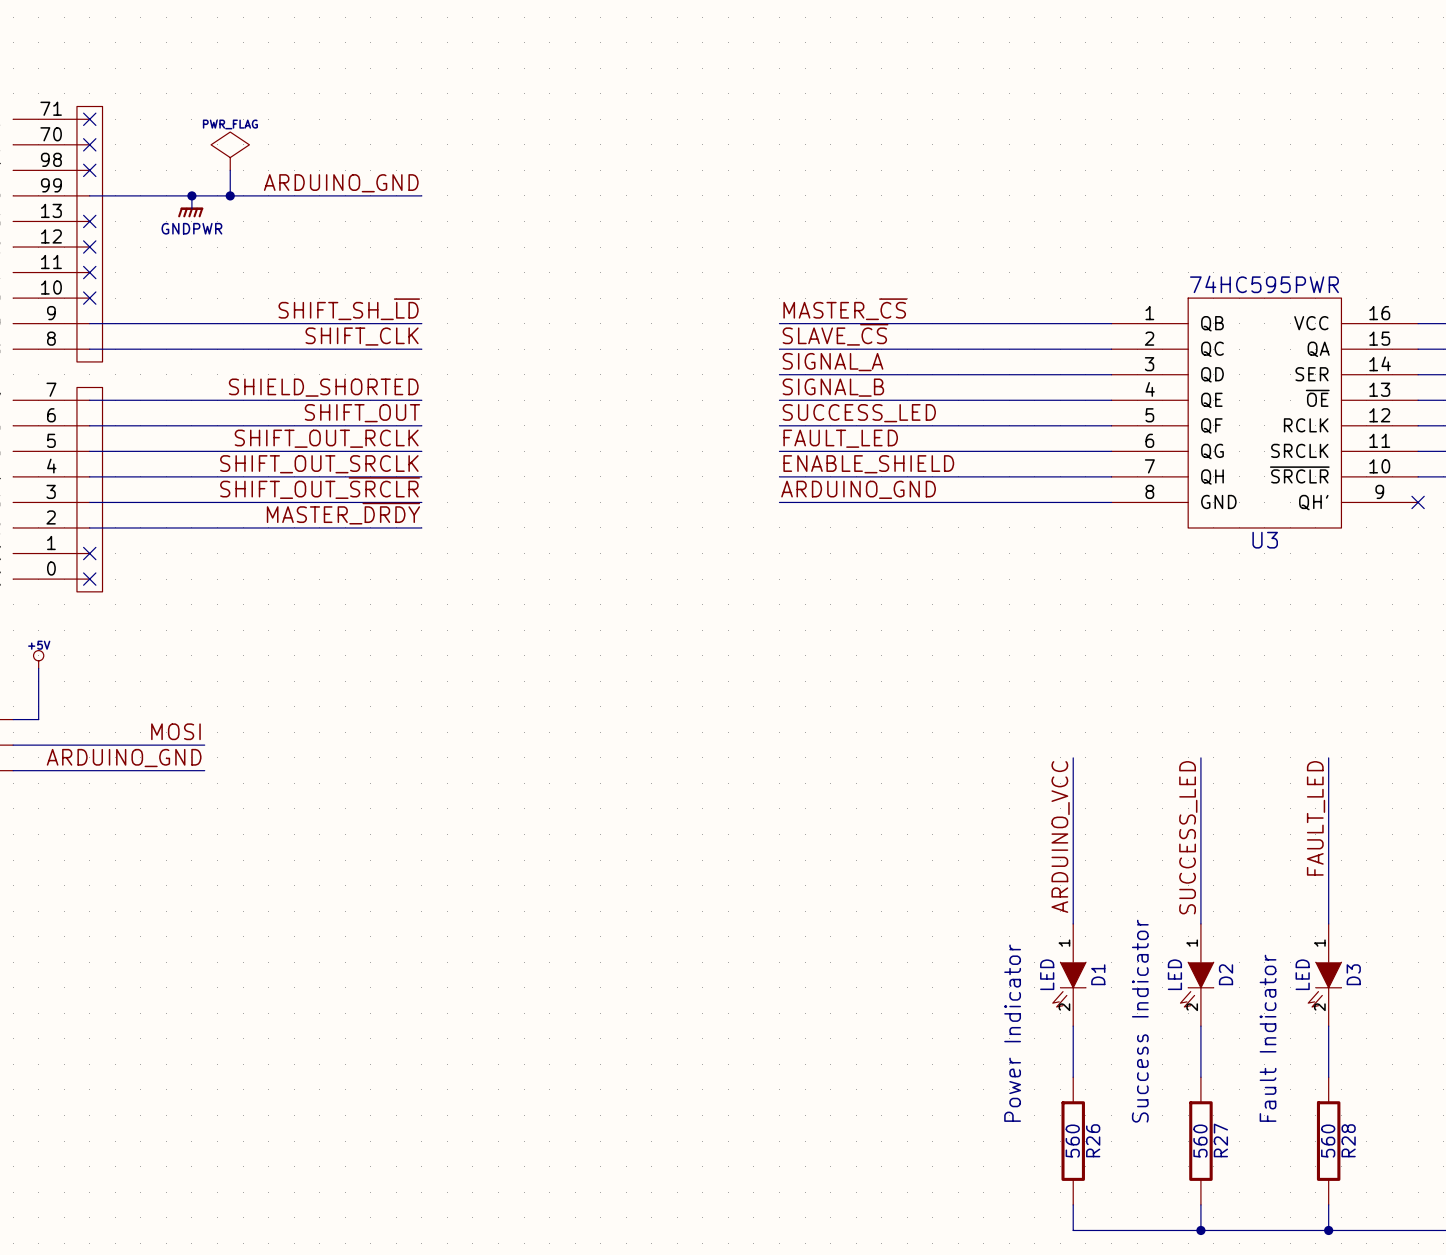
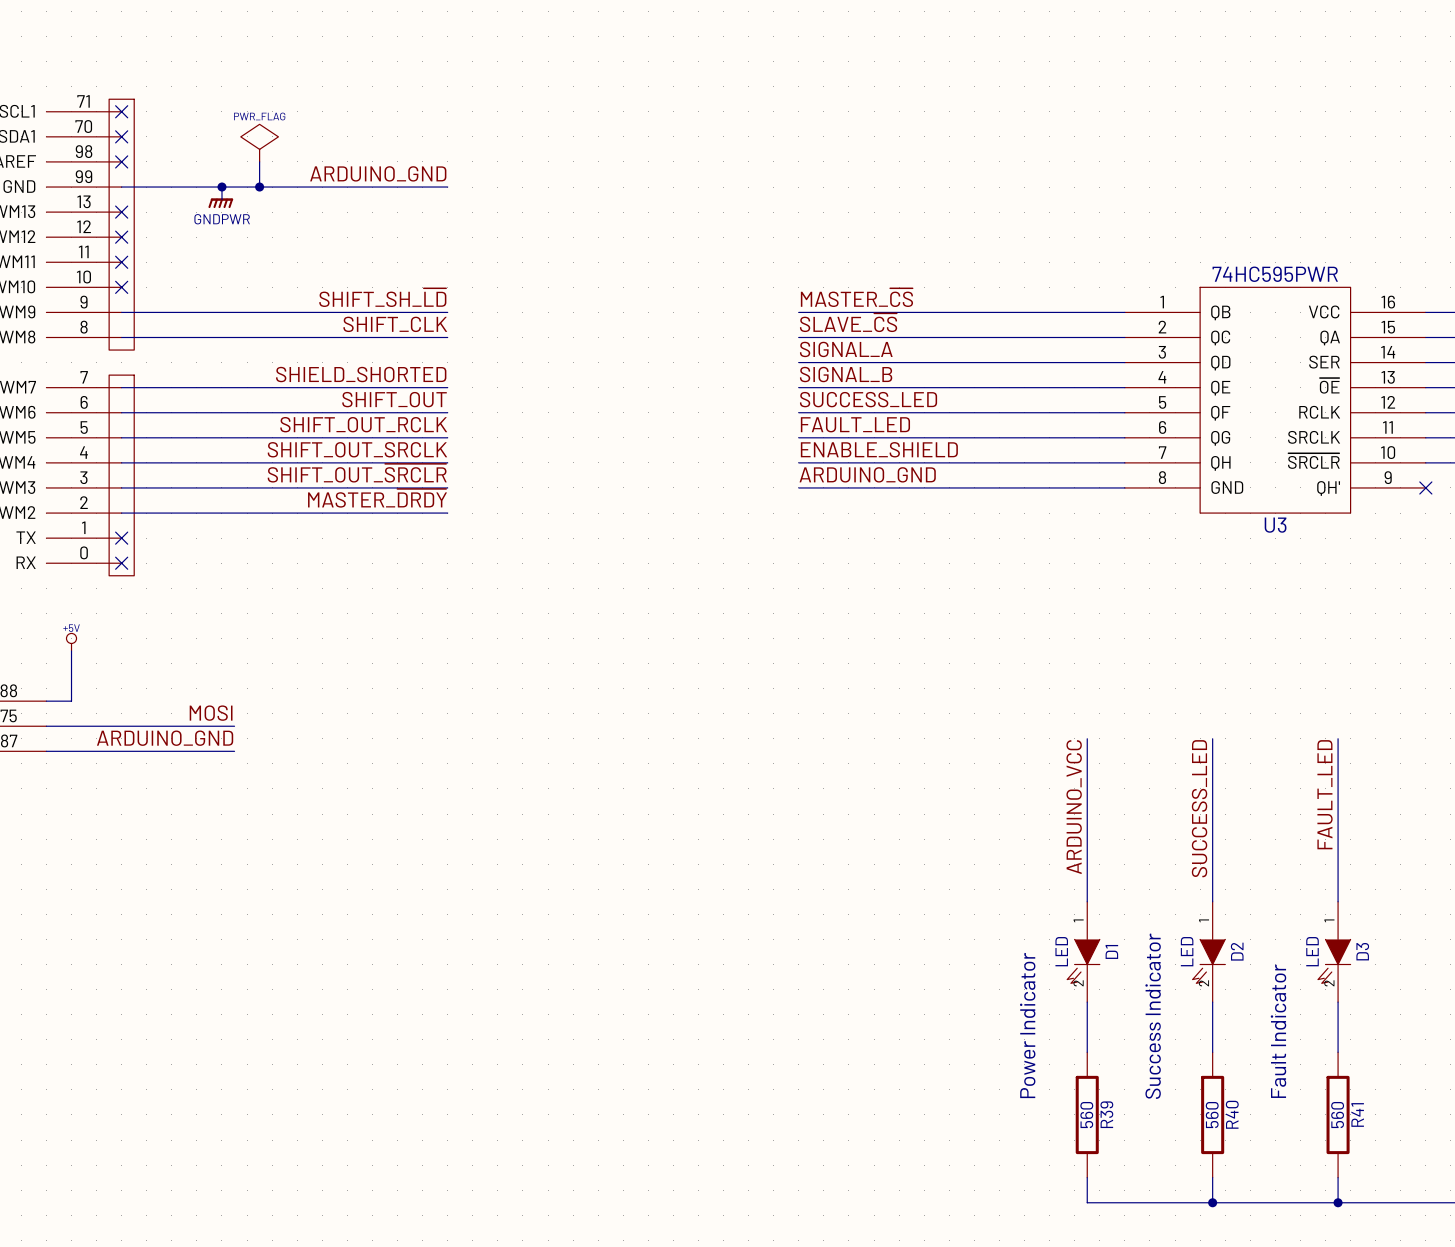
R26 name: R26 (1093, 1140) -> R39 (1106, 1114)
R27 name: R27 (1220, 1140) -> R40 (1232, 1114)
R28 name: R28 (1348, 1140) -> R41 (1357, 1114)

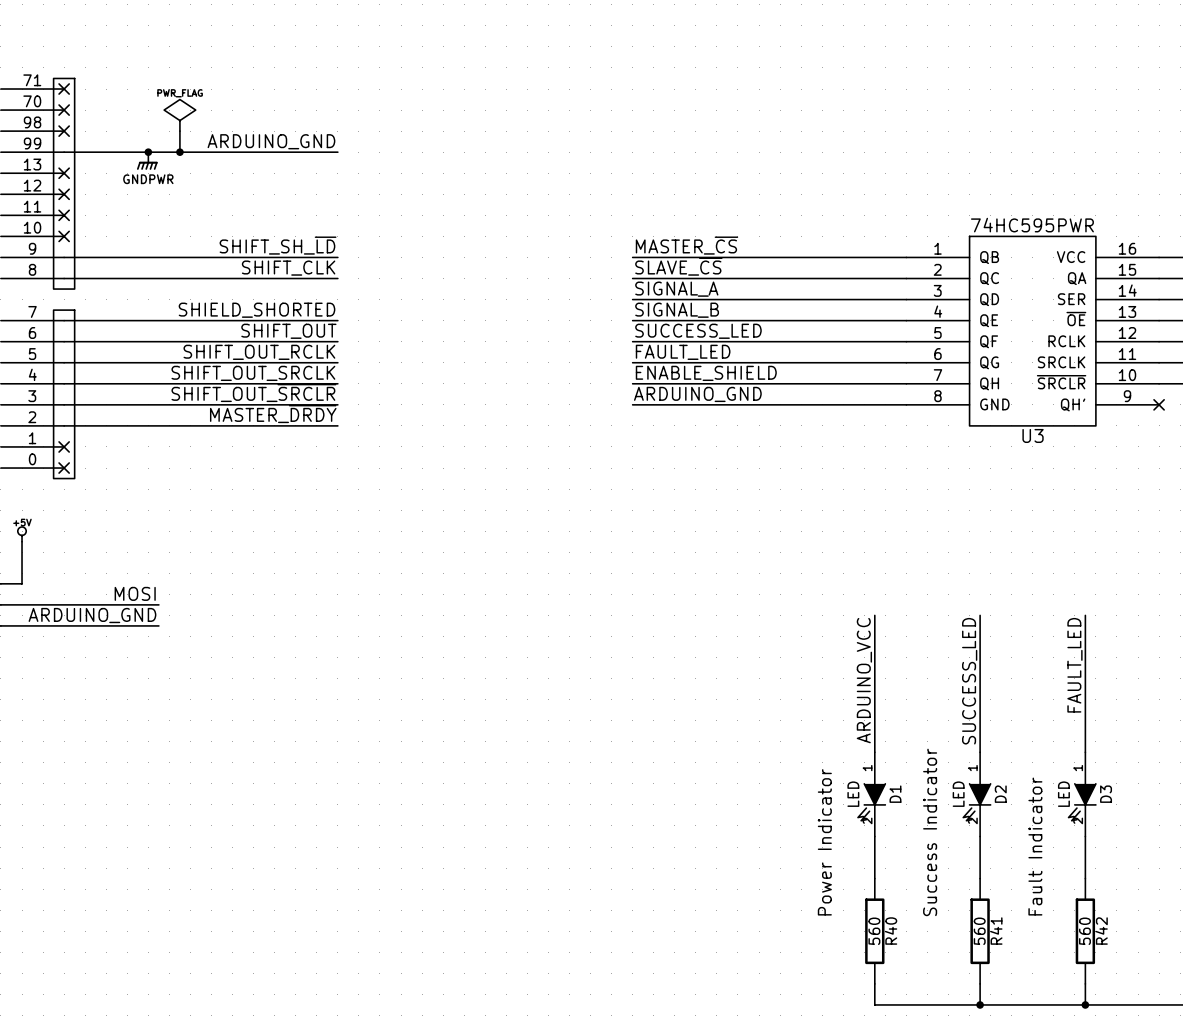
R39 name: R39 (1106, 1114) -> R40 (891, 931)
R40 name: R40 (1232, 1114) -> R41 (996, 931)
R41 name: R41 (1357, 1114) -> R42 (1101, 931)

